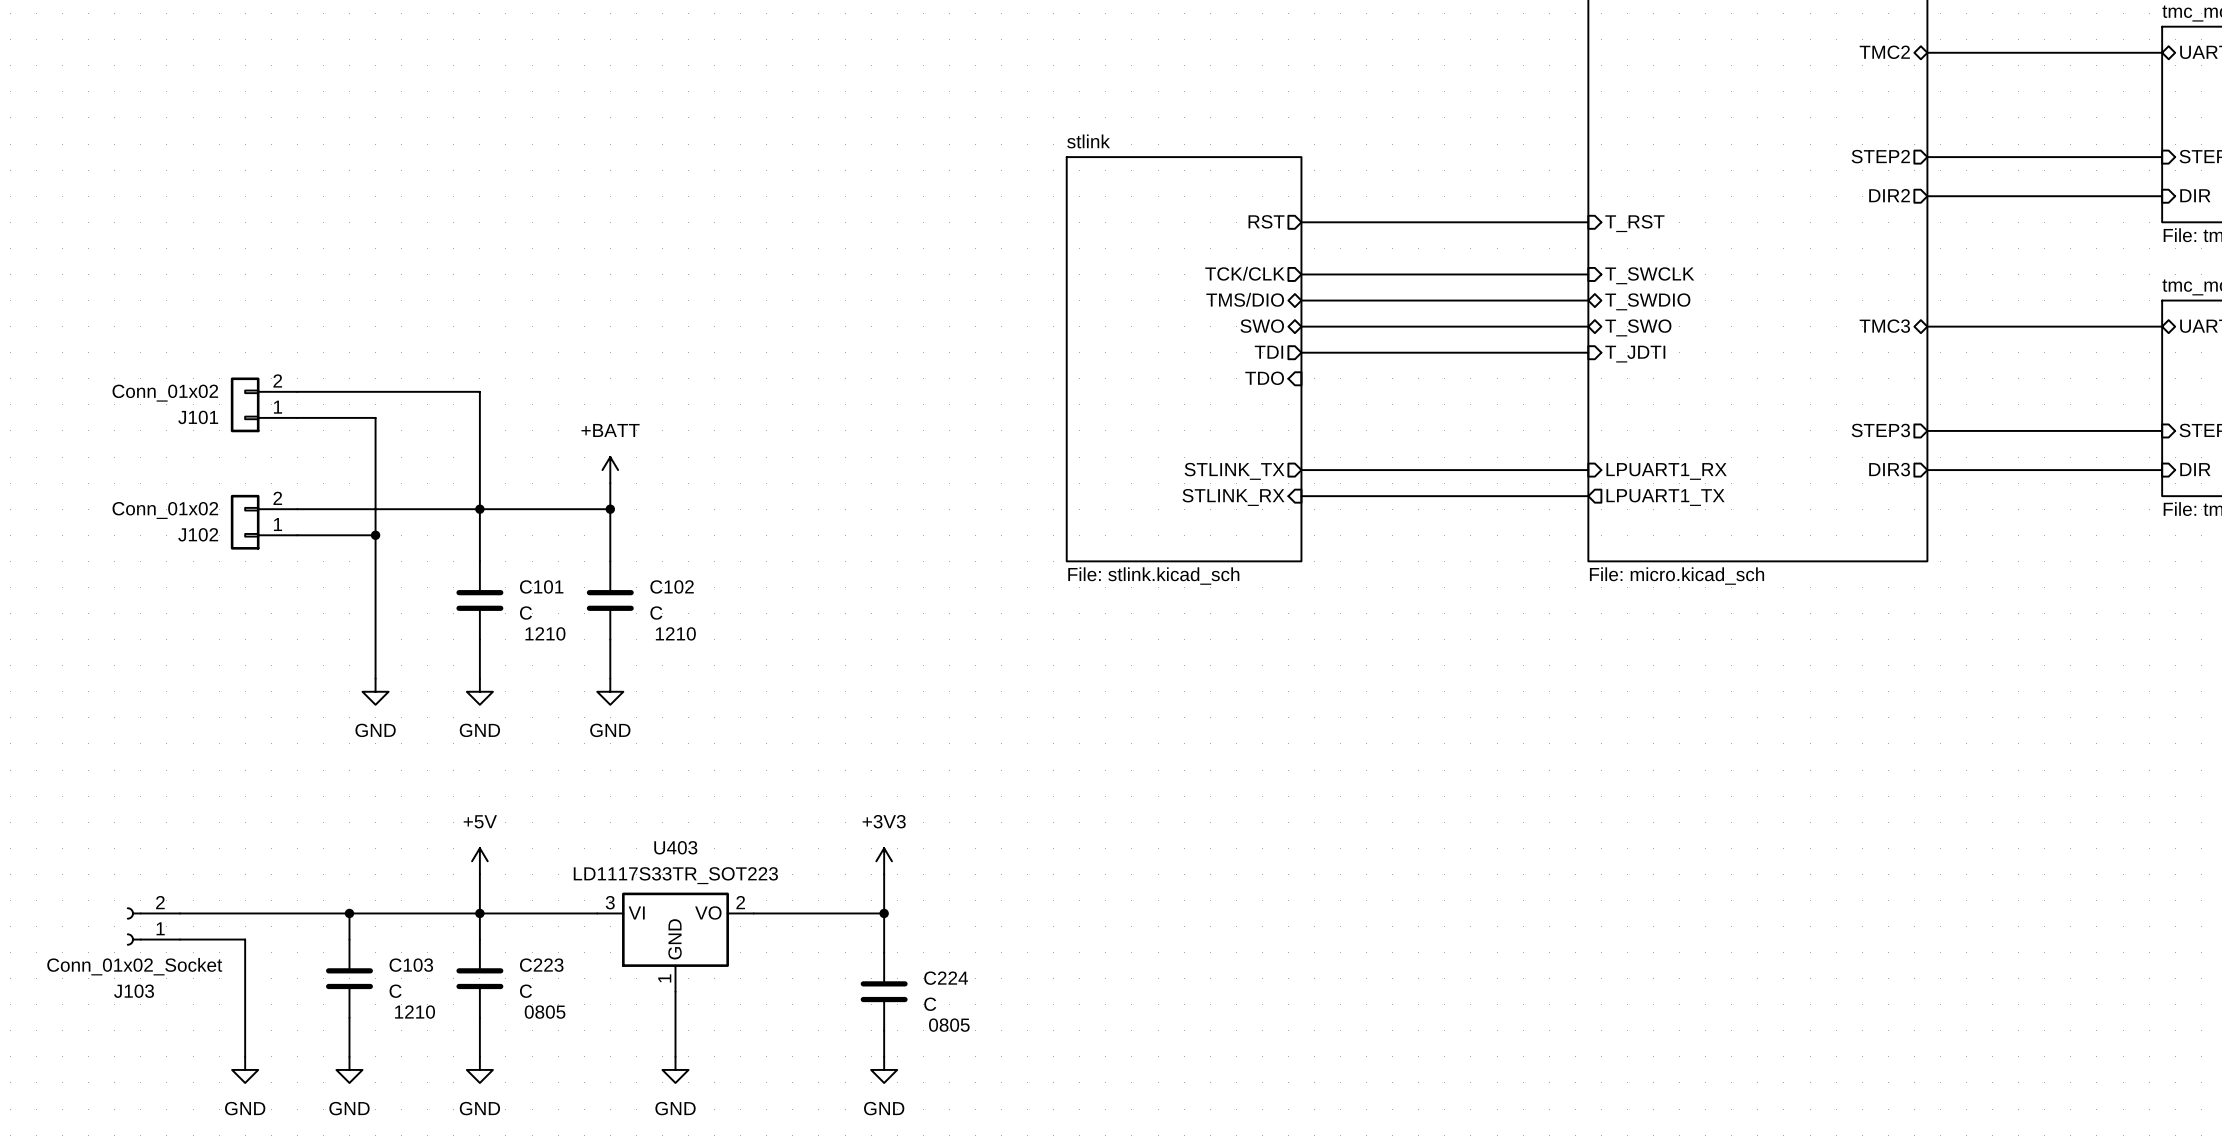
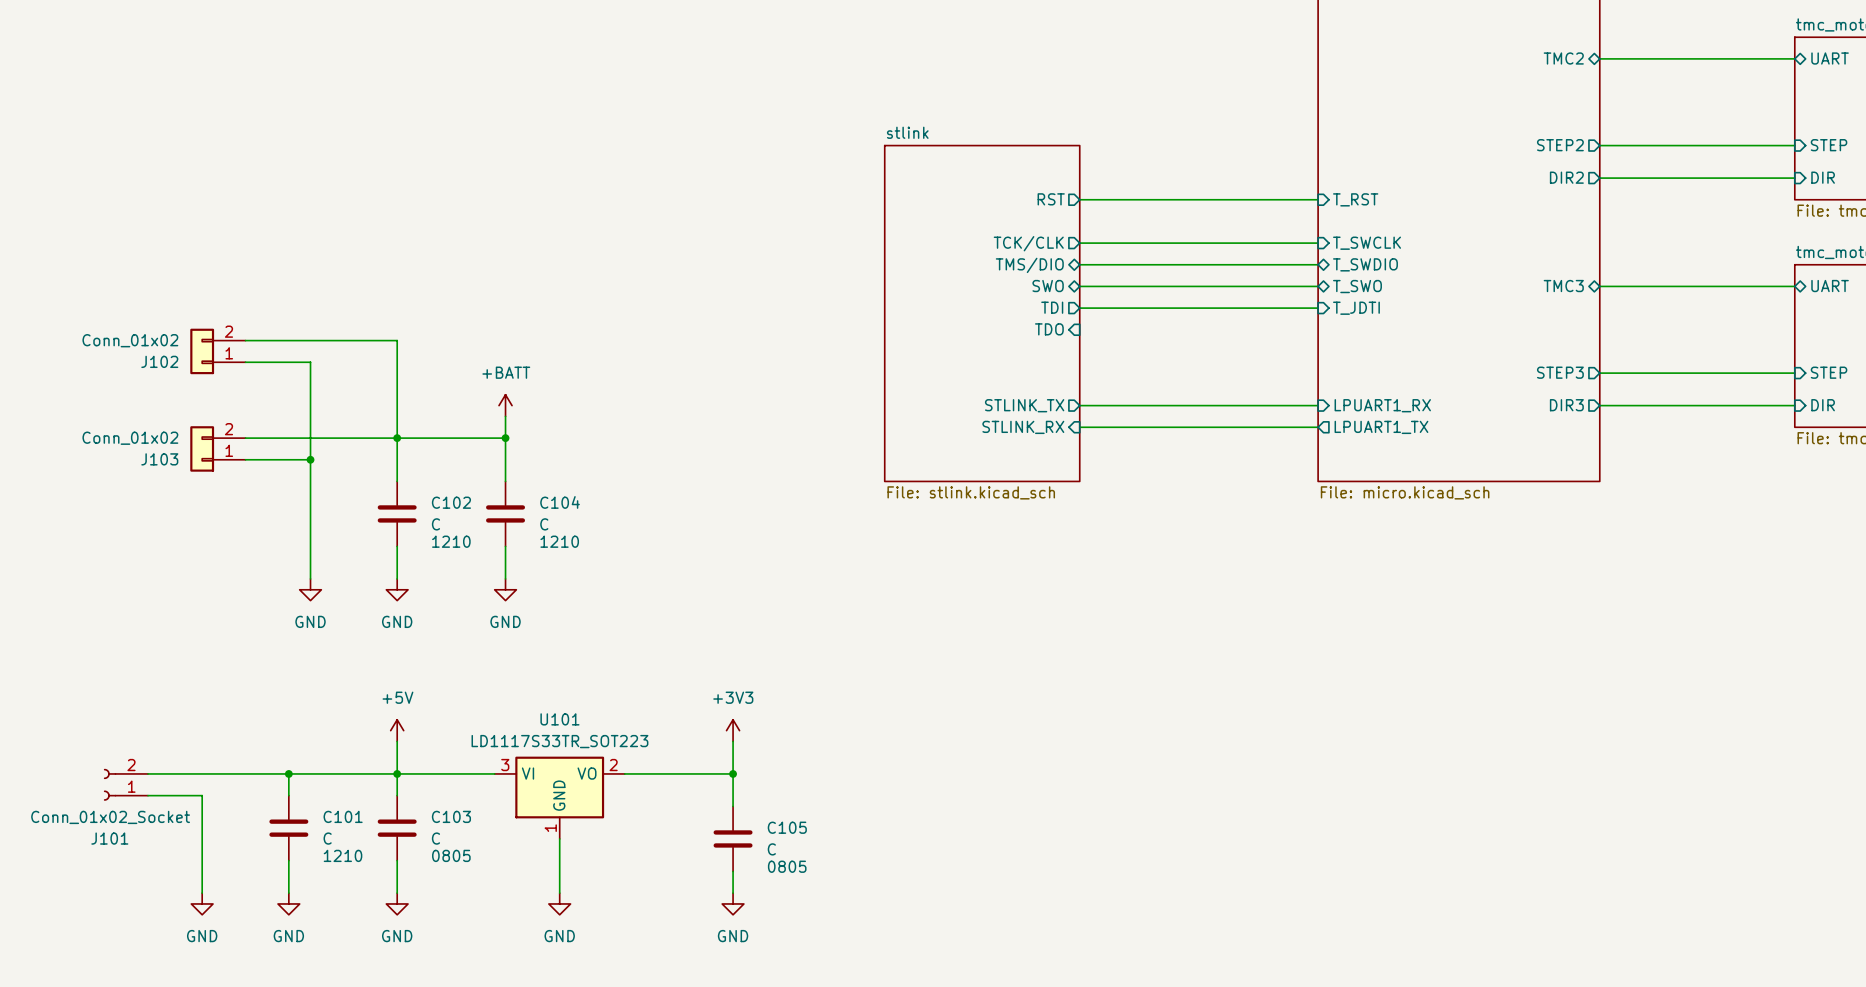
J101 name: J101 (198, 417) -> J102 (159, 361)
J102 name: J102 (198, 534) -> J103 (159, 459)
C101 name: C101 (541, 586) -> C102 (451, 502)
C102 name: C102 (672, 586) -> C104 (560, 502)
U403 name: U403 (675, 847) -> U101 (559, 719)
C103 name: C103 (411, 965) -> C101 (343, 816)
C223 name: C223 (541, 965) -> C103 (451, 816)
C224 name: C224 (946, 978) -> C105 (787, 827)
J103 name: J103 (134, 991) -> J101 (109, 838)

